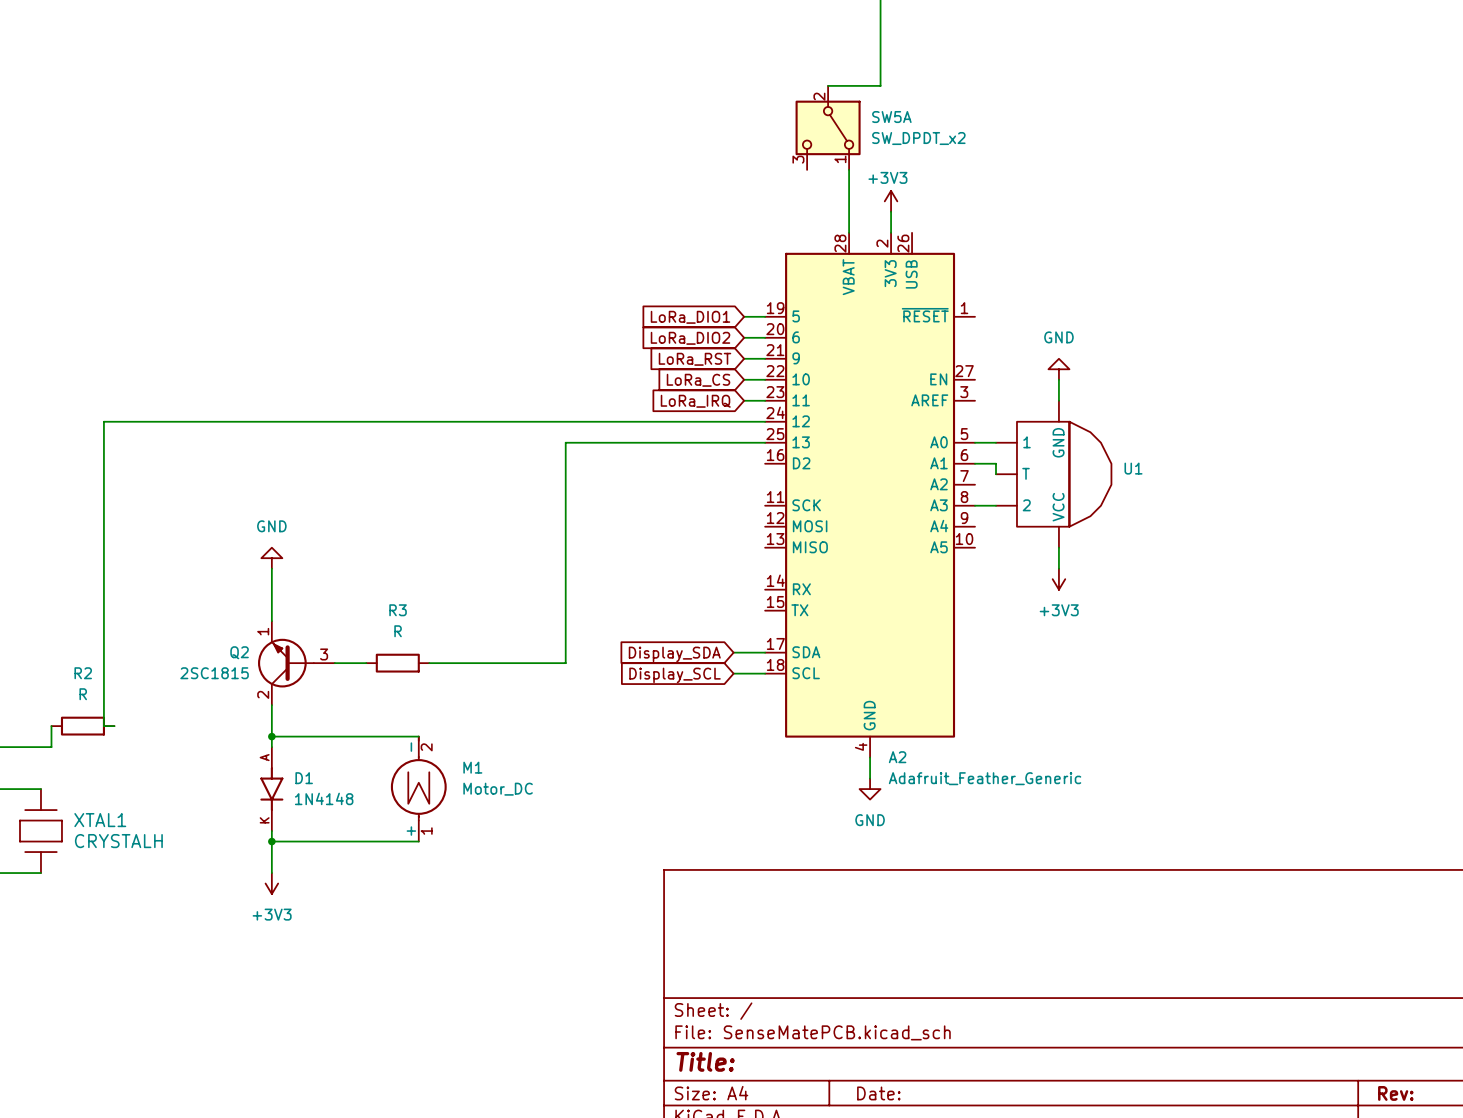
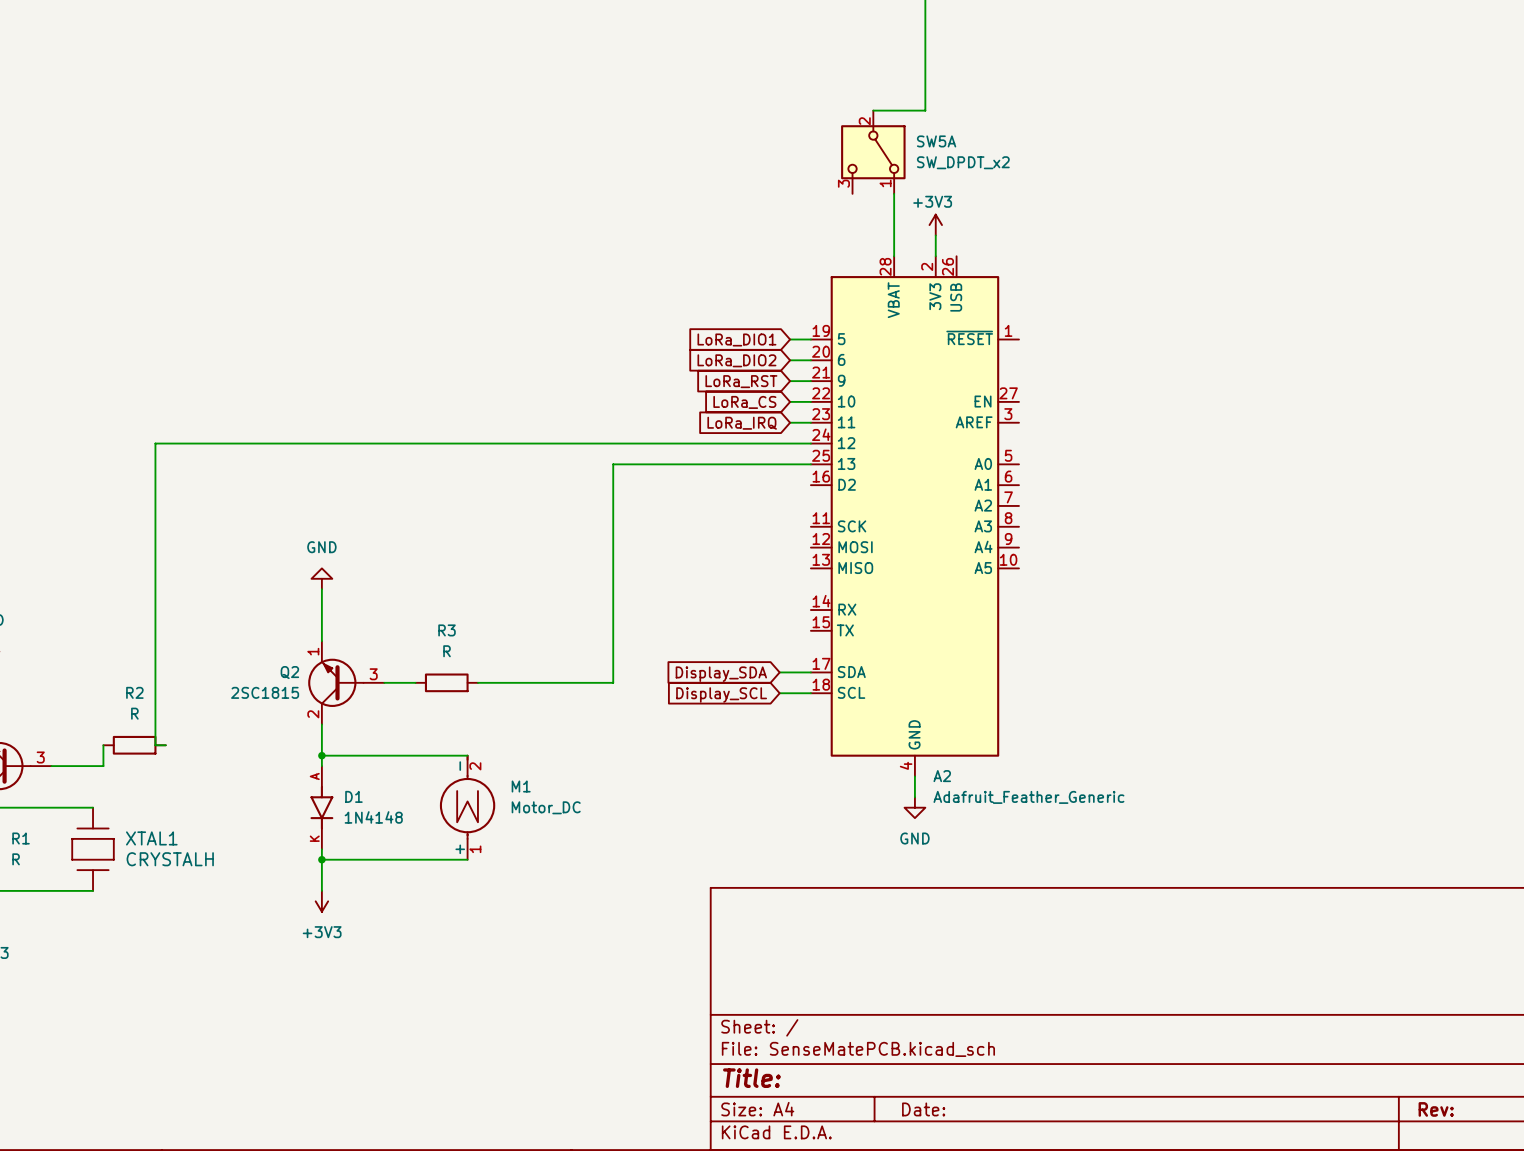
power symbol: GND (1058, 369) -> none
wire: (1058, 379) (1058, 400) -> none
wire: (975, 442) (995, 442) -> none
wire: (975, 463) (995, 463) (995, 474) -> none
U1: (1053, 474) -> none
wire: (975, 505) (995, 505) -> none
wire: (1058, 547) (1058, 568) -> none
power symbol: +3V3 (1058, 579) -> none

